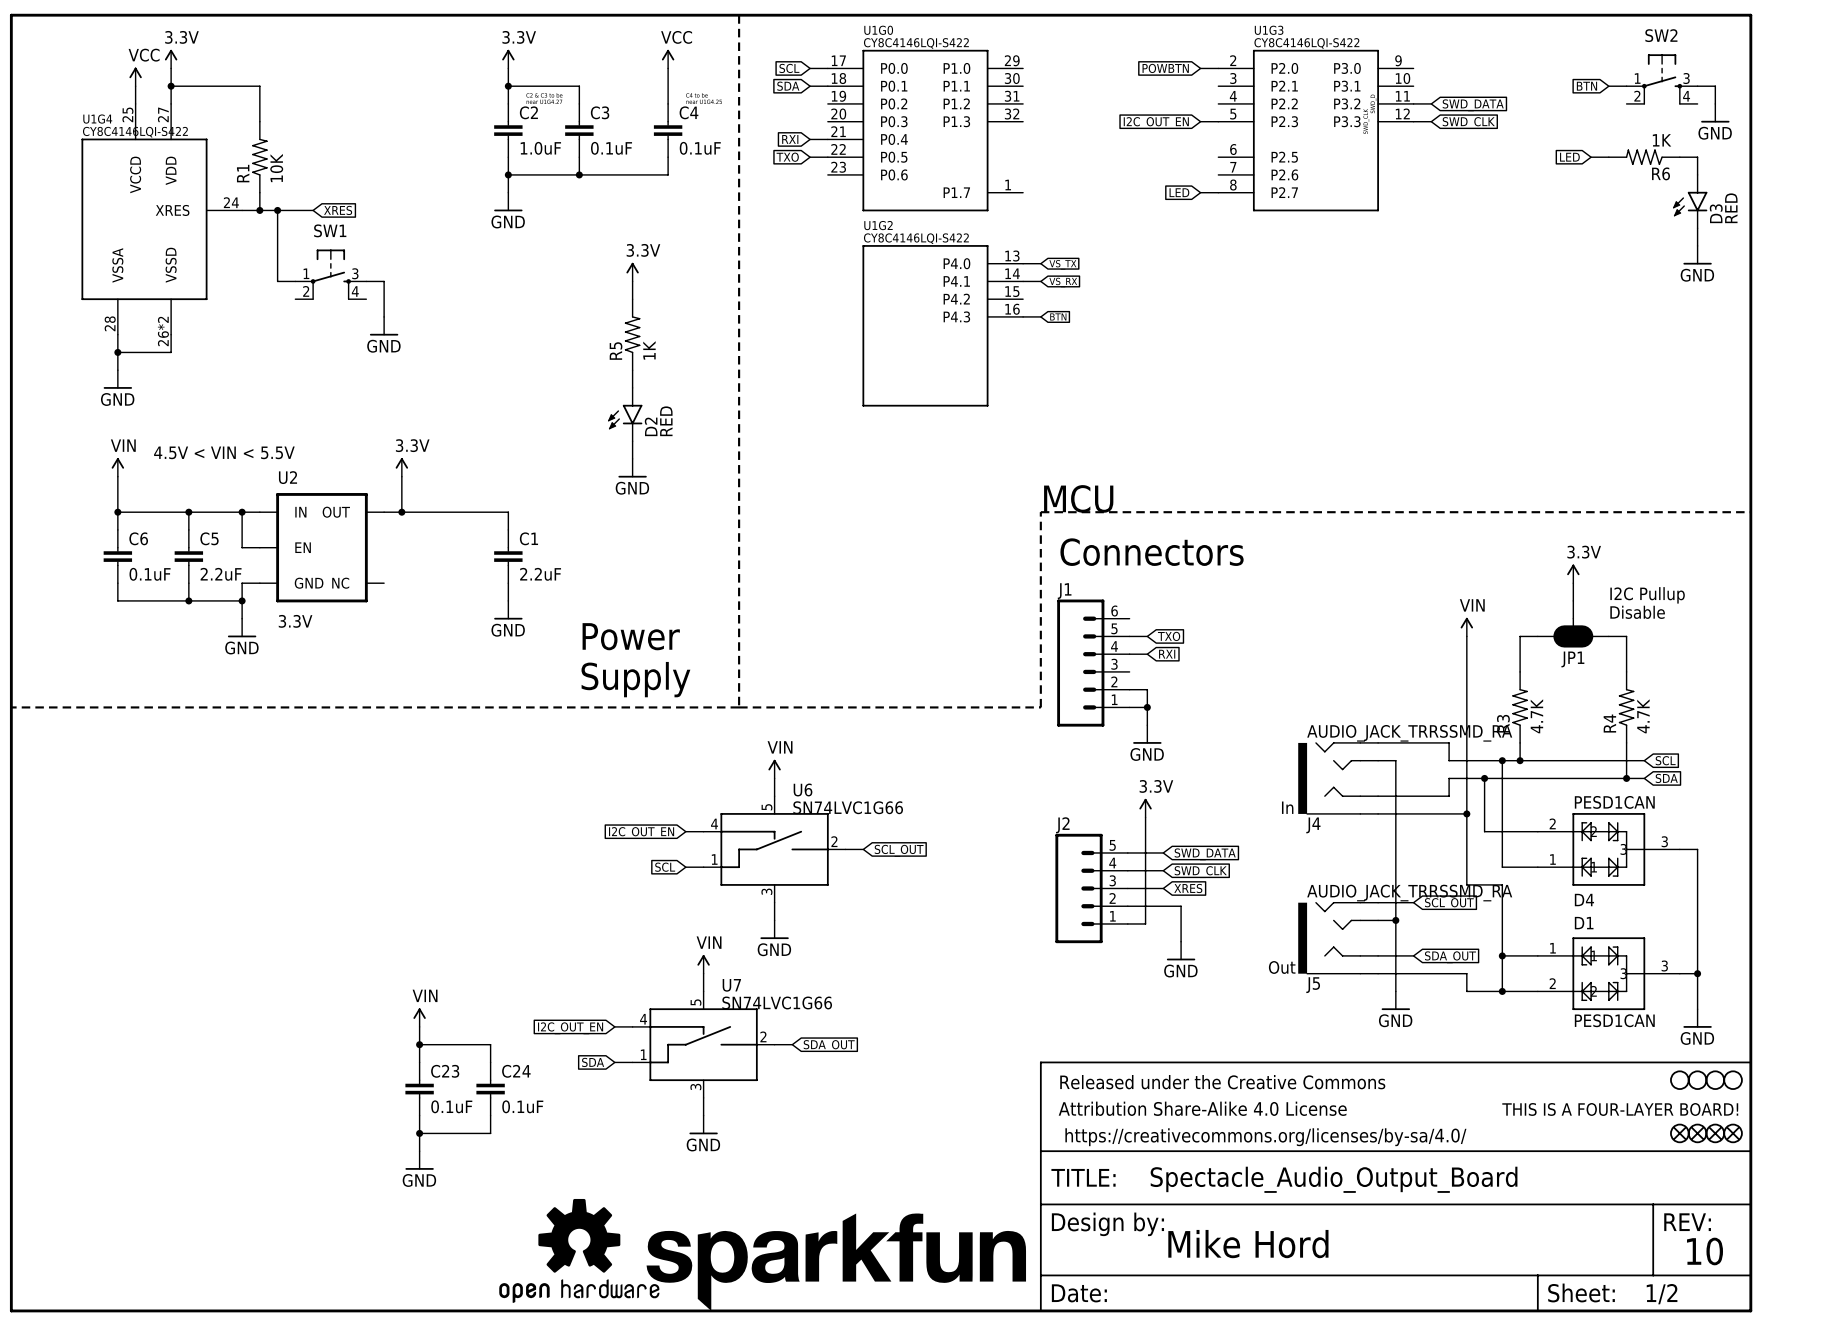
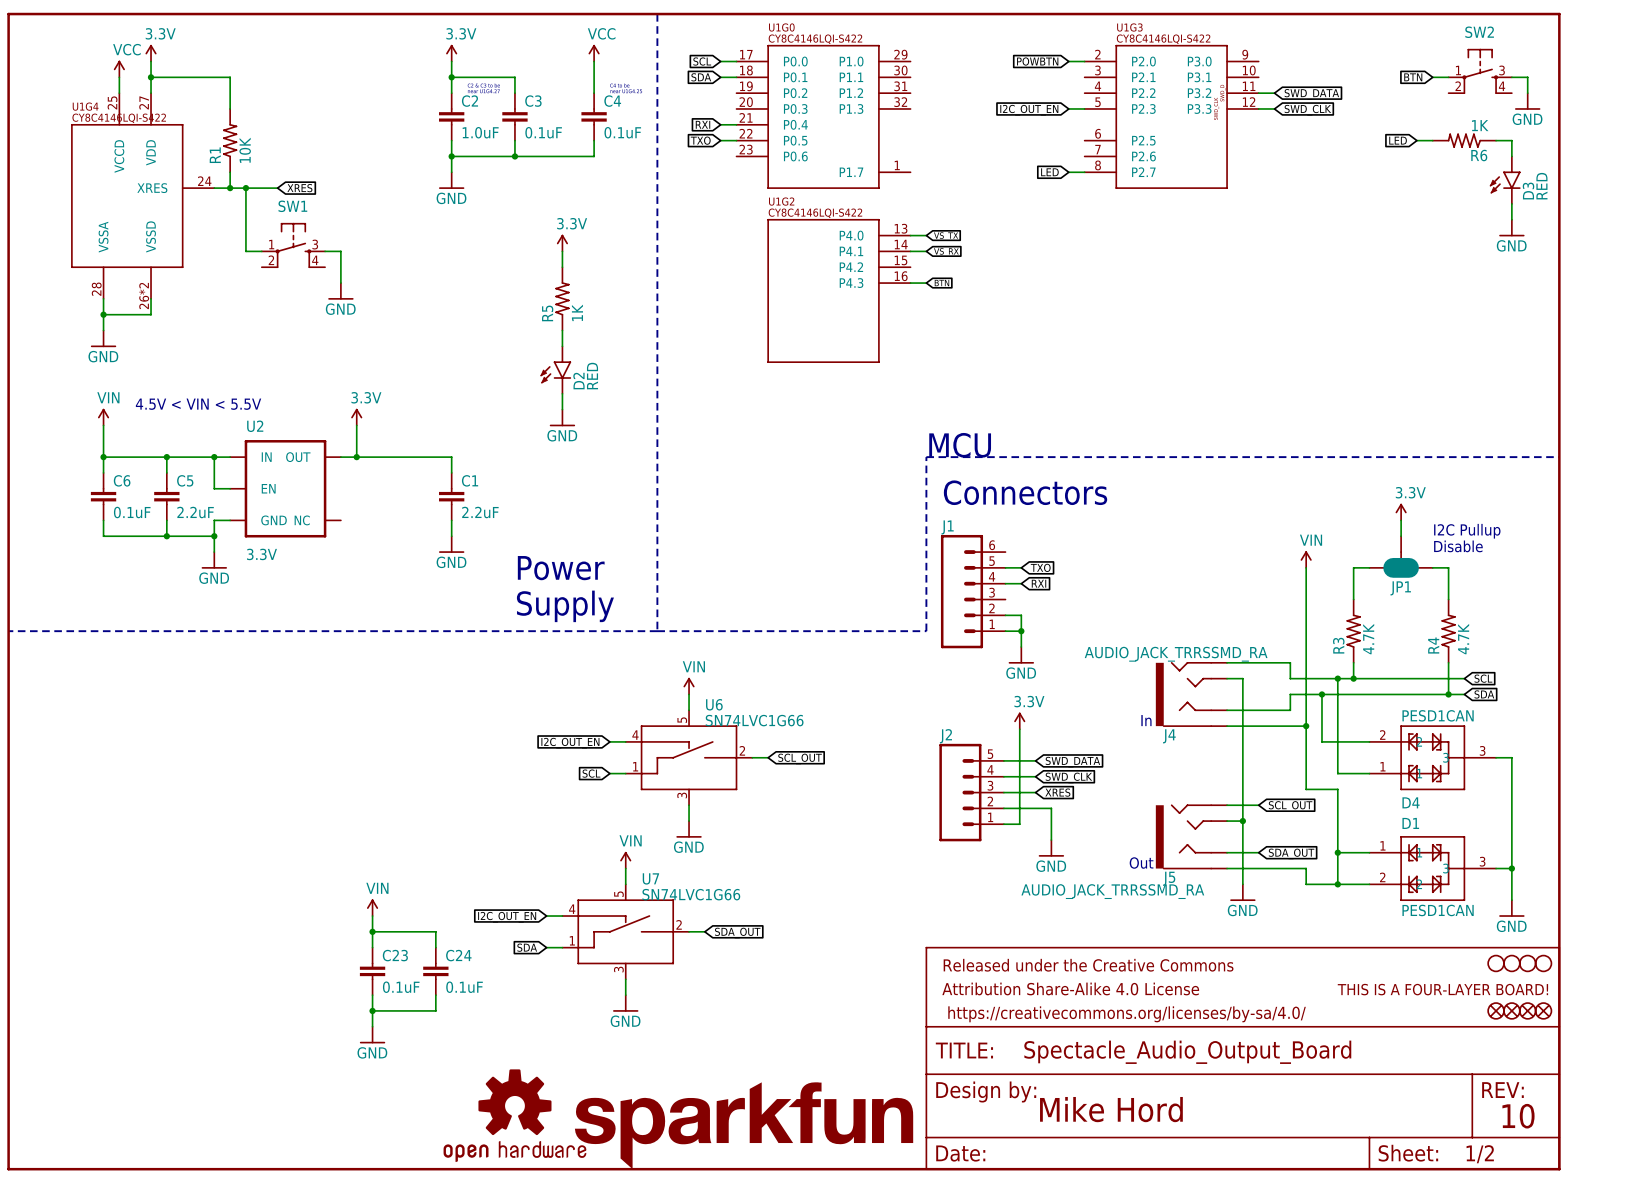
J4 value position: AUDIO_JACK_TRRSSMD_RA (1409, 733) -> AUDIO_JACK_TRRSSMD_RA (1176, 654)
J5 value position: AUDIO_JACK_TRRSSMD_RA (1409, 893) -> AUDIO_JACK_TRRSSMD_RA (1112, 891)

